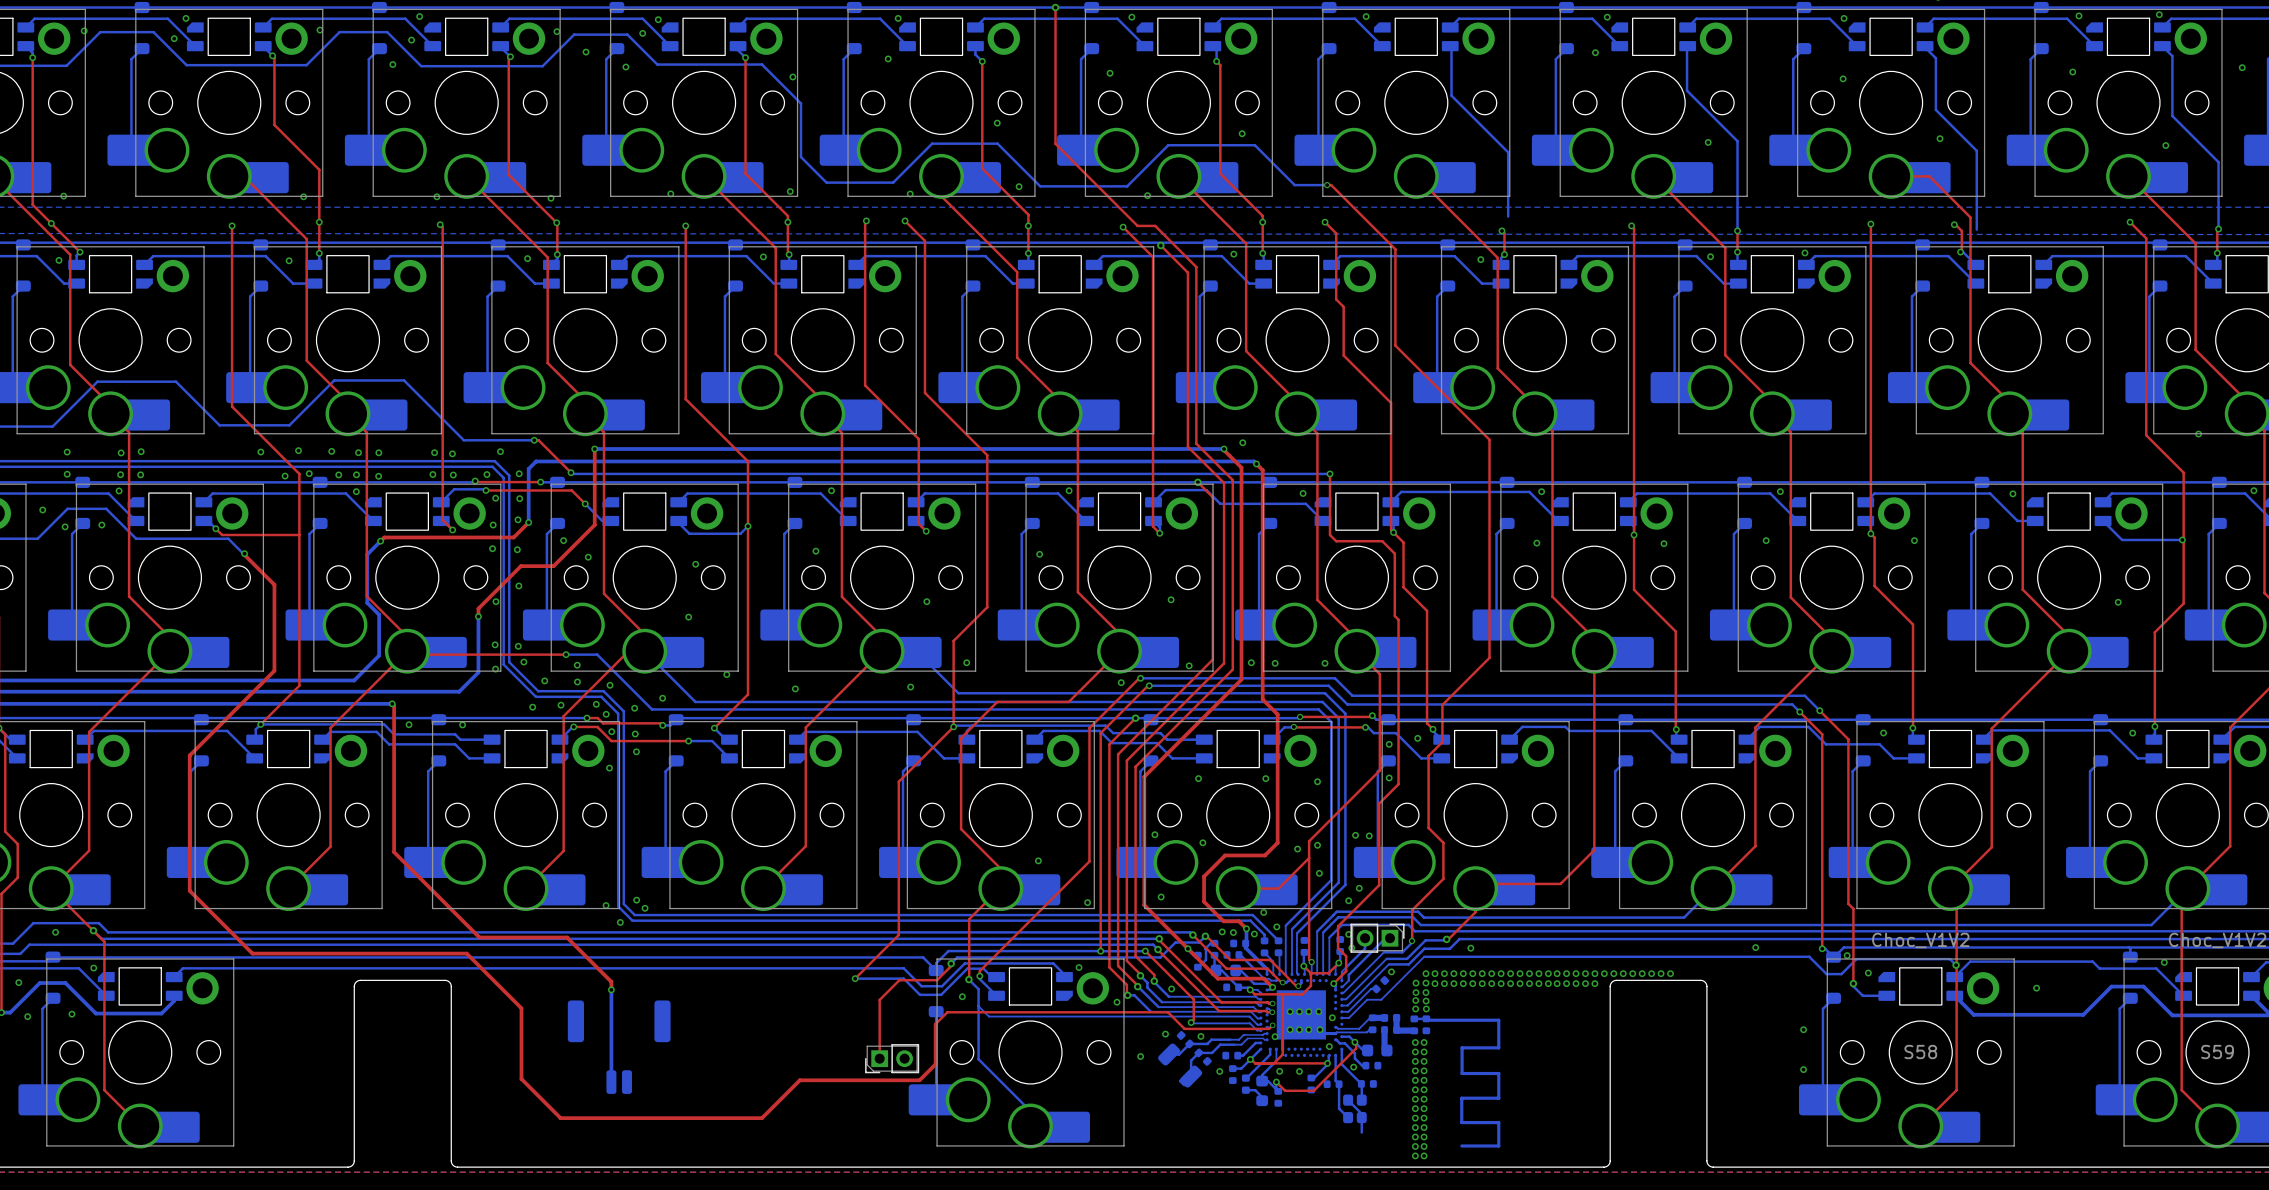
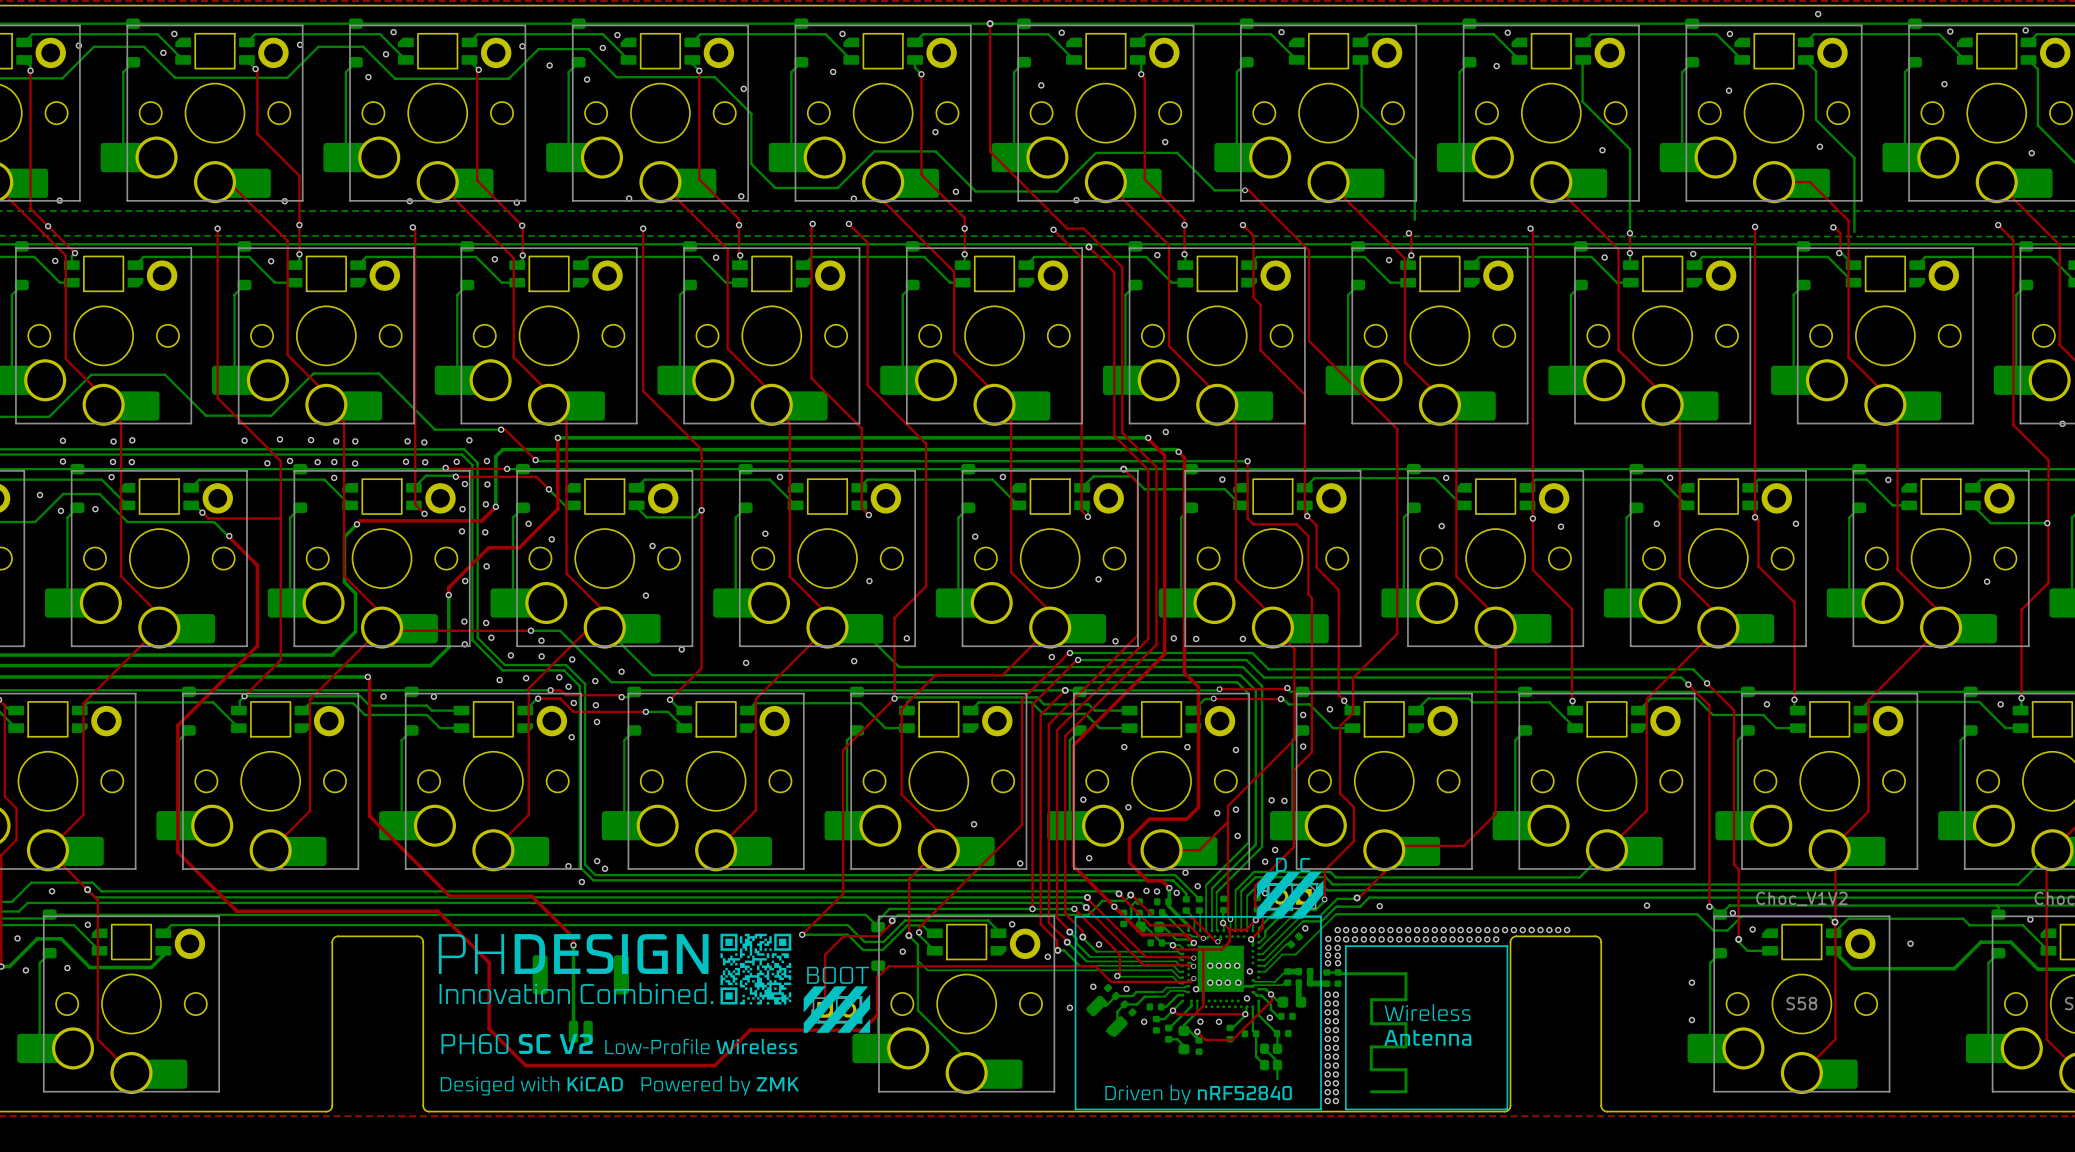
drawing: none -> [1257, 857, 1324, 919]
line: none -> (1075, 916) (1075, 1109) (1320, 1109) (1320, 916) (1075, 916)
drawing: none -> [438, 933, 871, 1055]
line: none -> (1345, 946) (1345, 1109) (1507, 1109) (1507, 946) (1345, 946)
drawing: none -> [1384, 1004, 1472, 1046]
drawing: none -> [440, 1076, 623, 1096]
drawing: none -> [641, 1076, 799, 1096]
drawing: none -> [1105, 1084, 1292, 1105]

